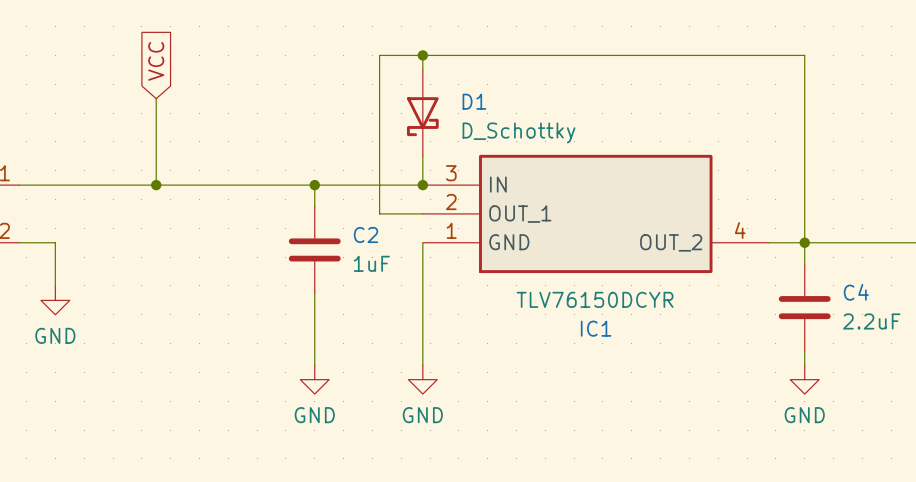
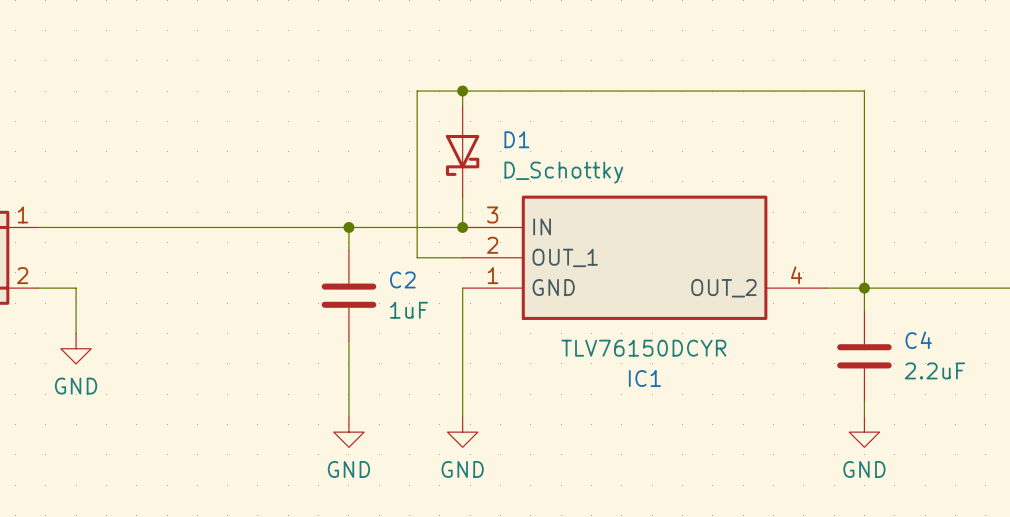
global label: VCC (156, 61) -> none
wire: (156, 98) (156, 185) -> none
junction: (156, 185) -> none

